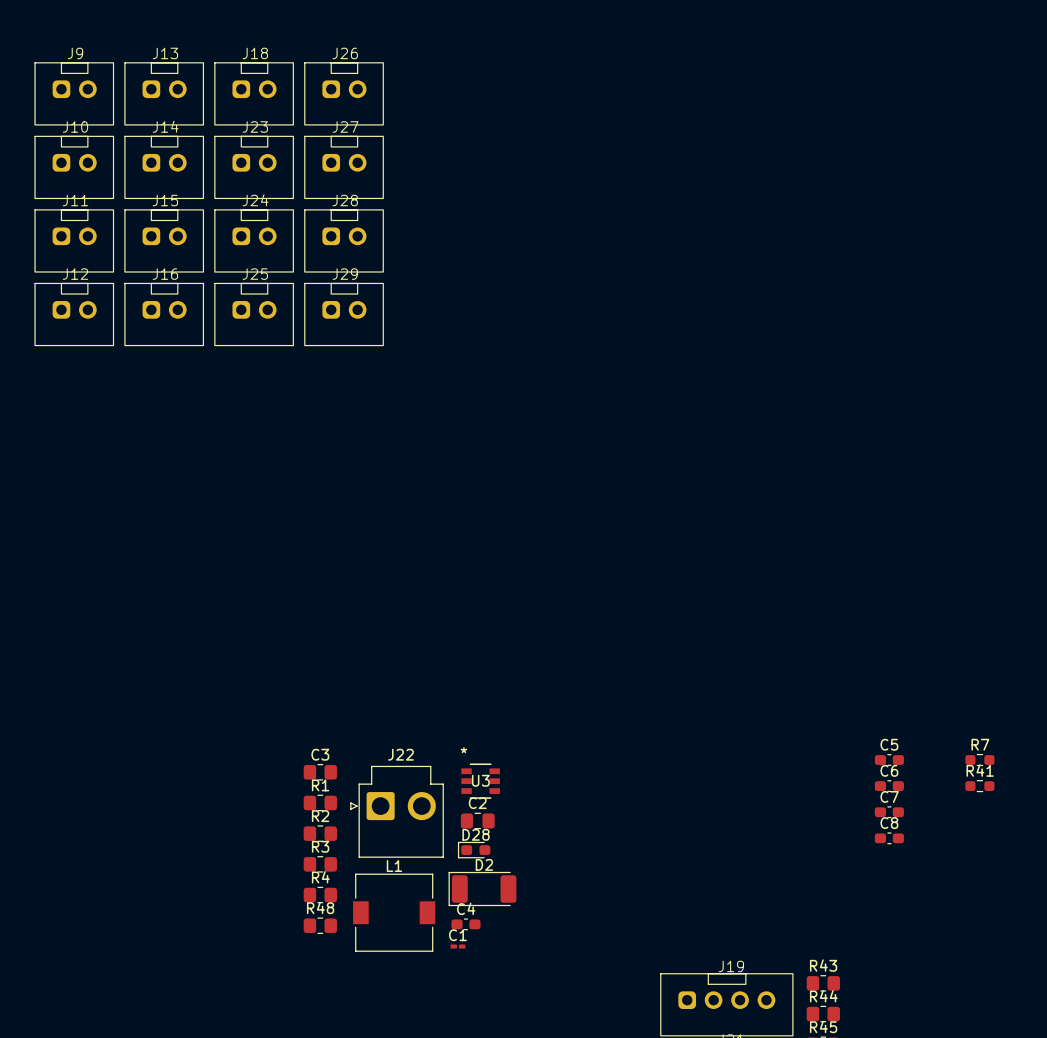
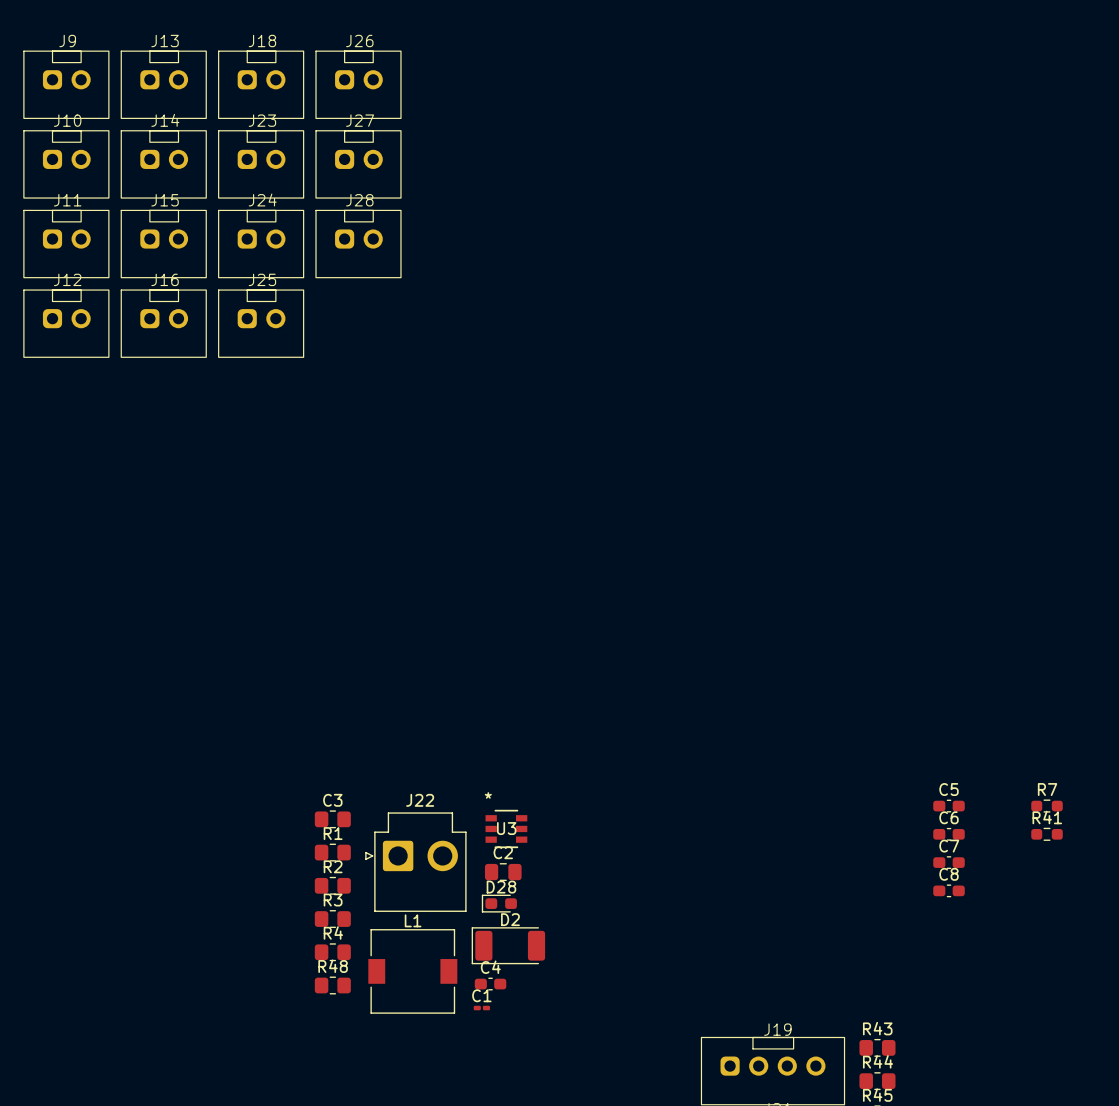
J29: (344, 314) -> none

